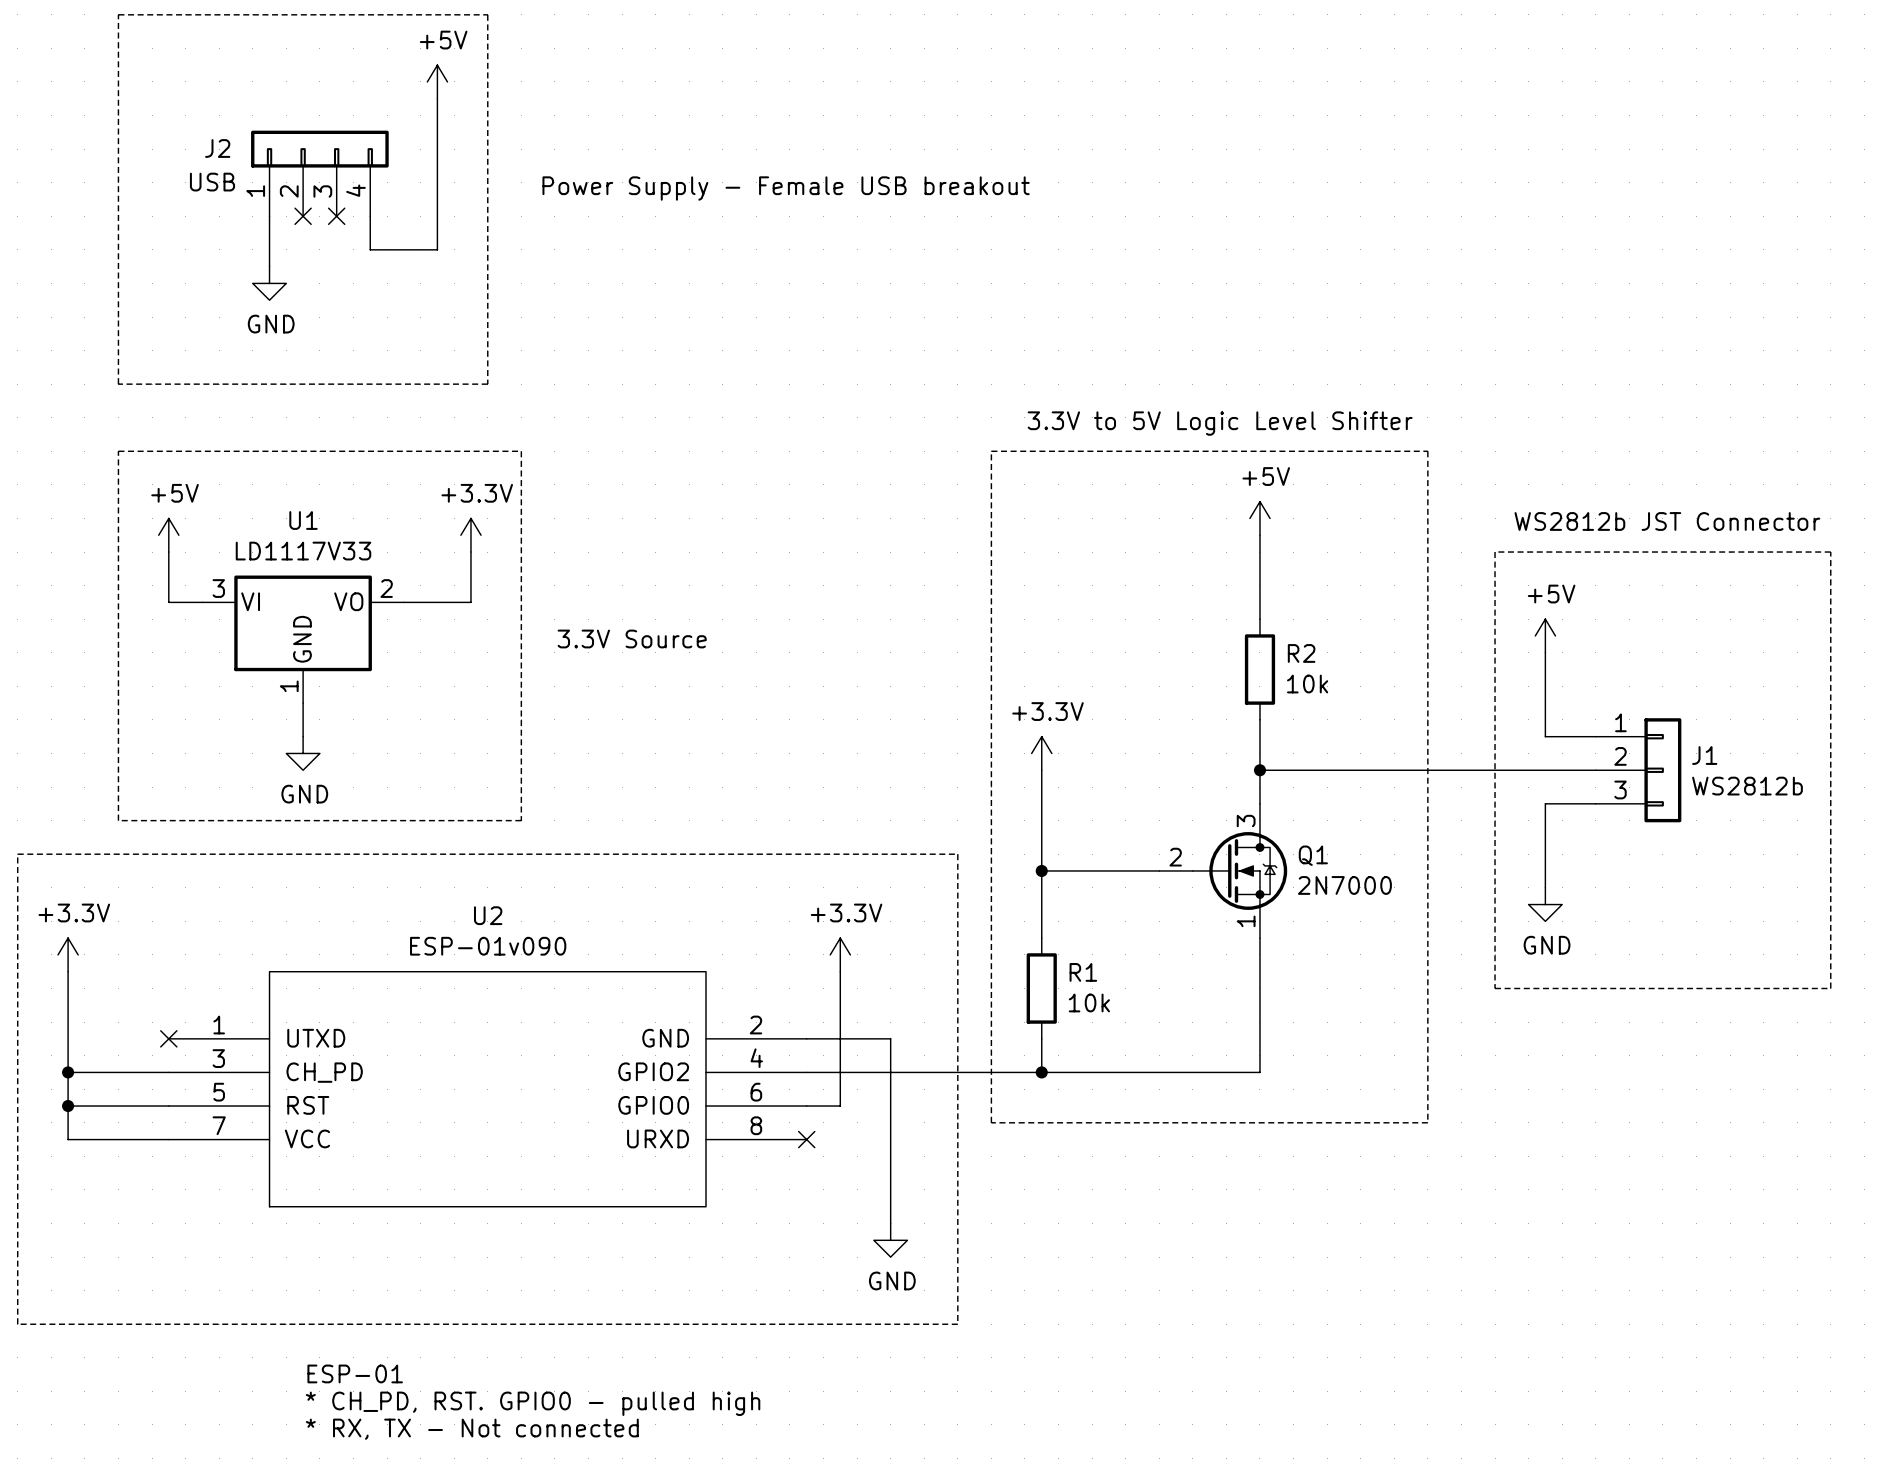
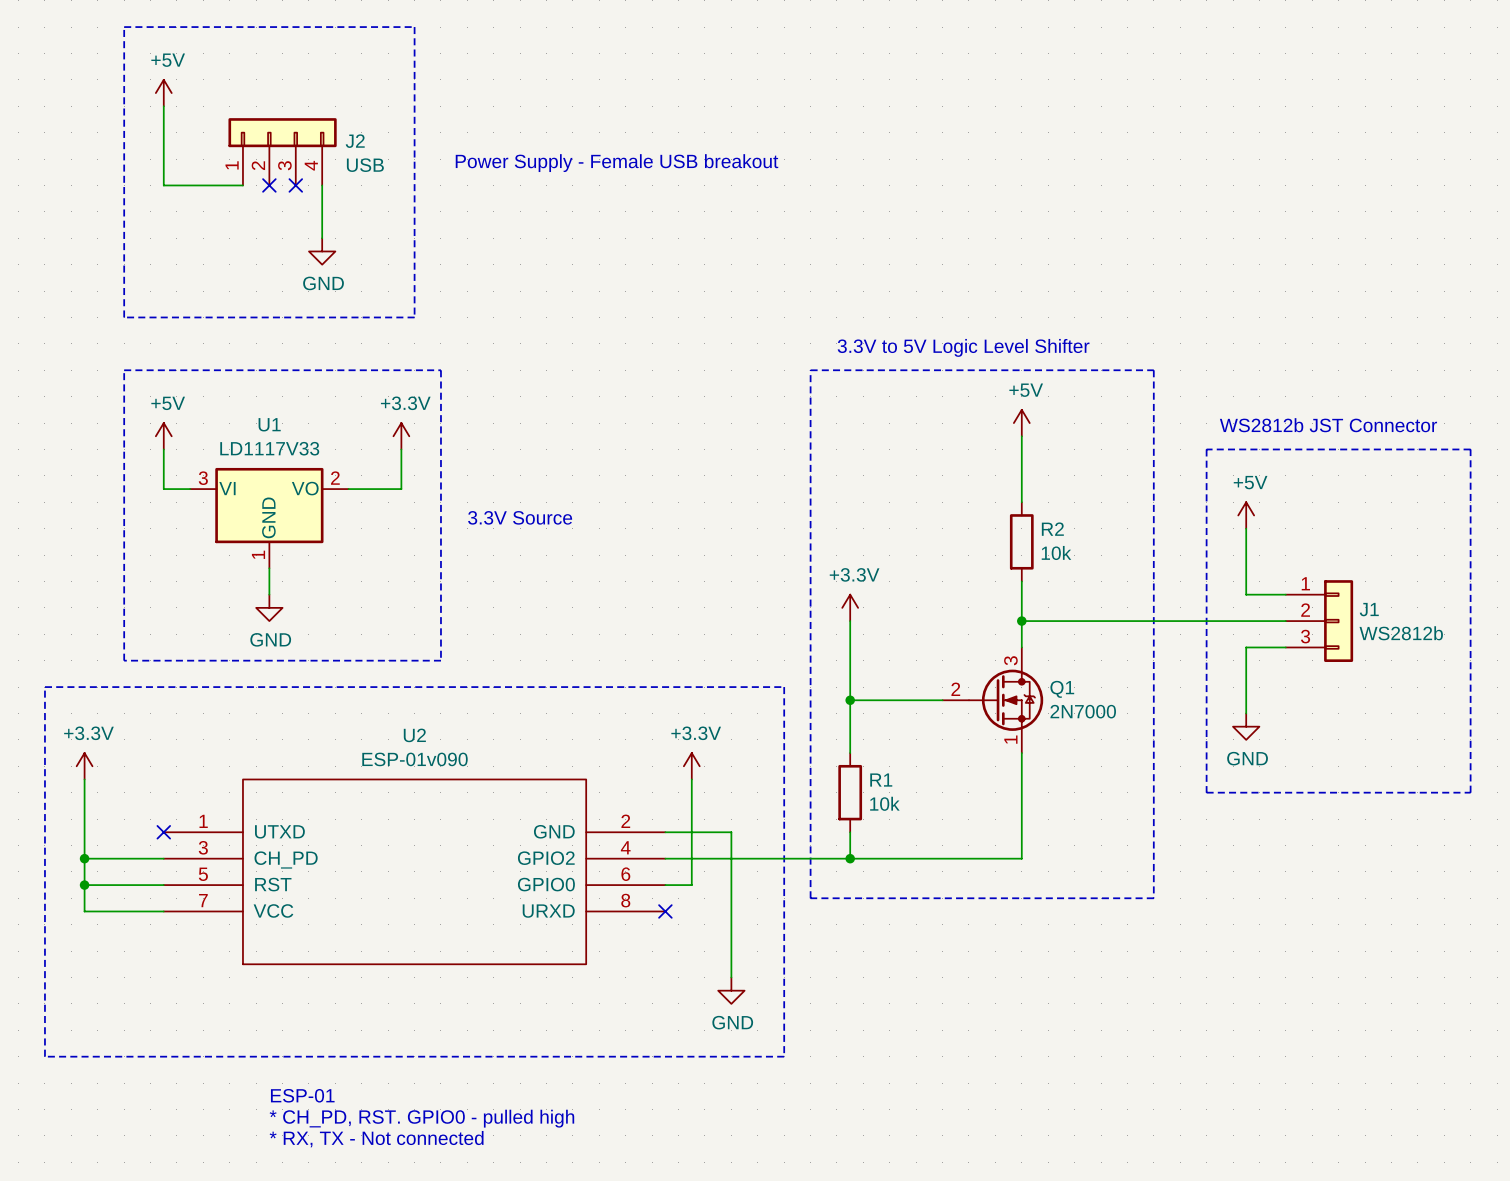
power symbol position: +5V (437, 81) -> +5V (163, 93)
wire: (437, 98) (437, 249) (370, 249) -> (322, 238) (322, 211)
J2 name position: J2 (217, 148) -> J2 (355, 141)
J2 value position: USB (212, 182) -> USB (365, 165)
wire: (269, 216) (269, 266) -> (242, 185) (163, 185) (163, 106)
power symbol position: GND (269, 283) -> GND (322, 251)

